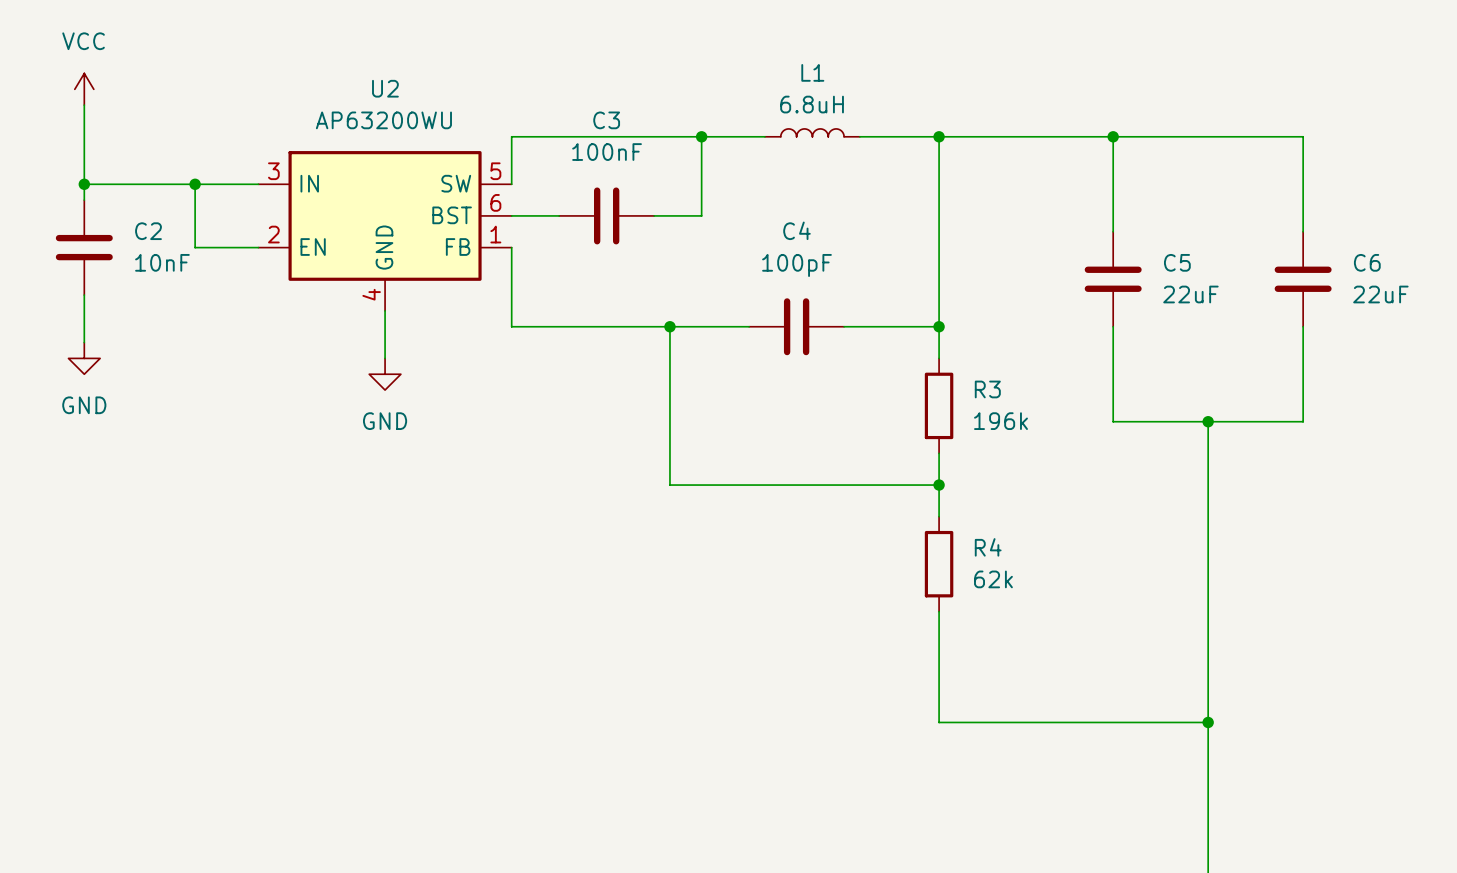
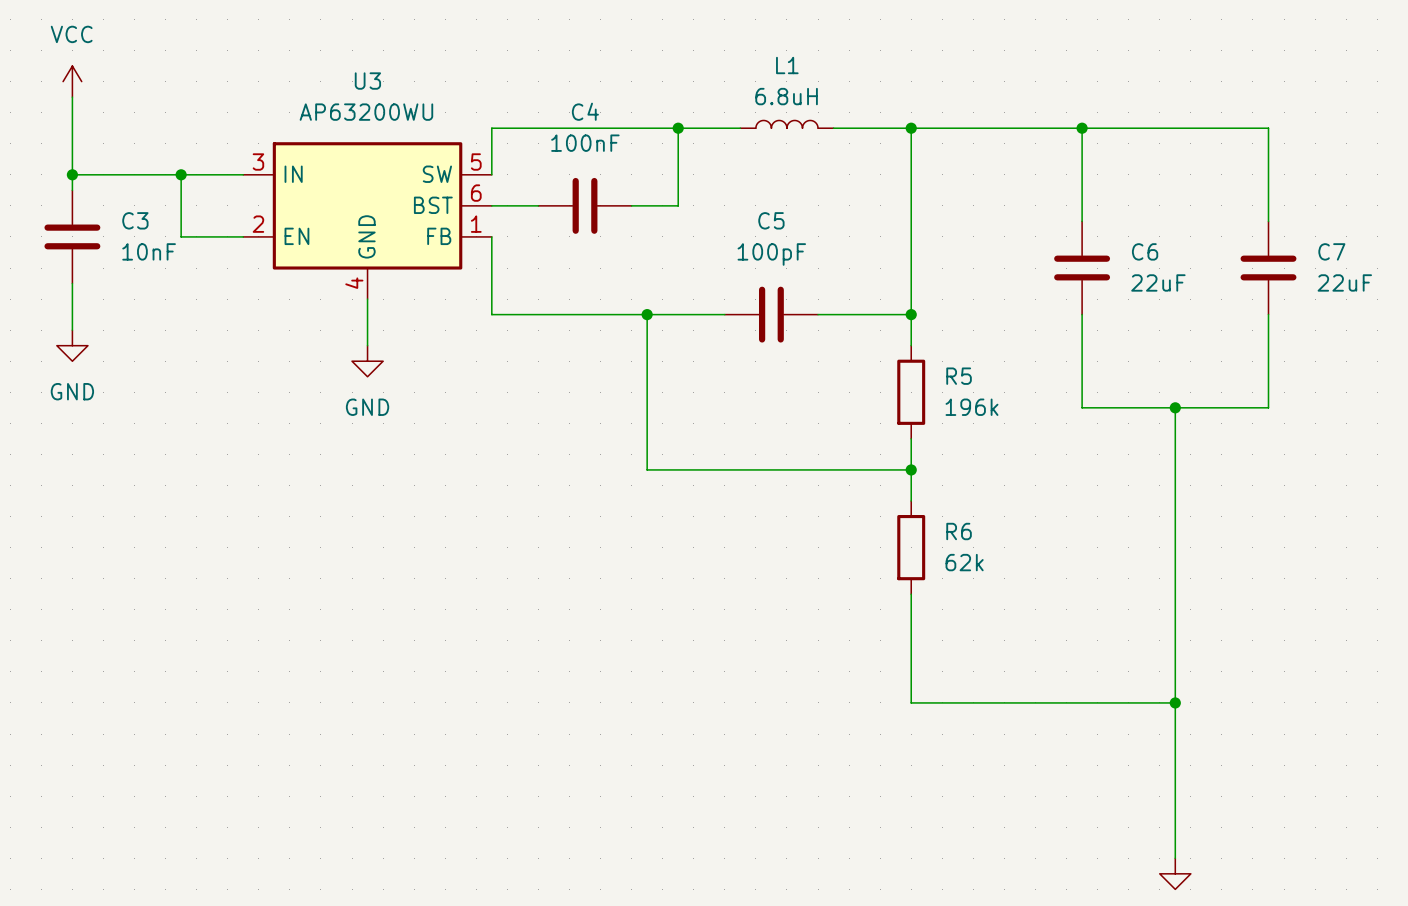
U2 name: U2 (385, 88) -> U3 (367, 81)
C3 name: C3 (606, 120) -> C4 (585, 111)
C4 name: C4 (796, 230) -> C5 (771, 220)
C2 name: C2 (148, 231) -> C3 (135, 220)
C5 name: C5 (1177, 262) -> C6 (1145, 251)
C6 name: C6 (1367, 262) -> C7 (1331, 251)
R3 name: R3 (987, 389) -> R5 (959, 376)
R4 name: R4 (988, 547) -> R6 (959, 531)

